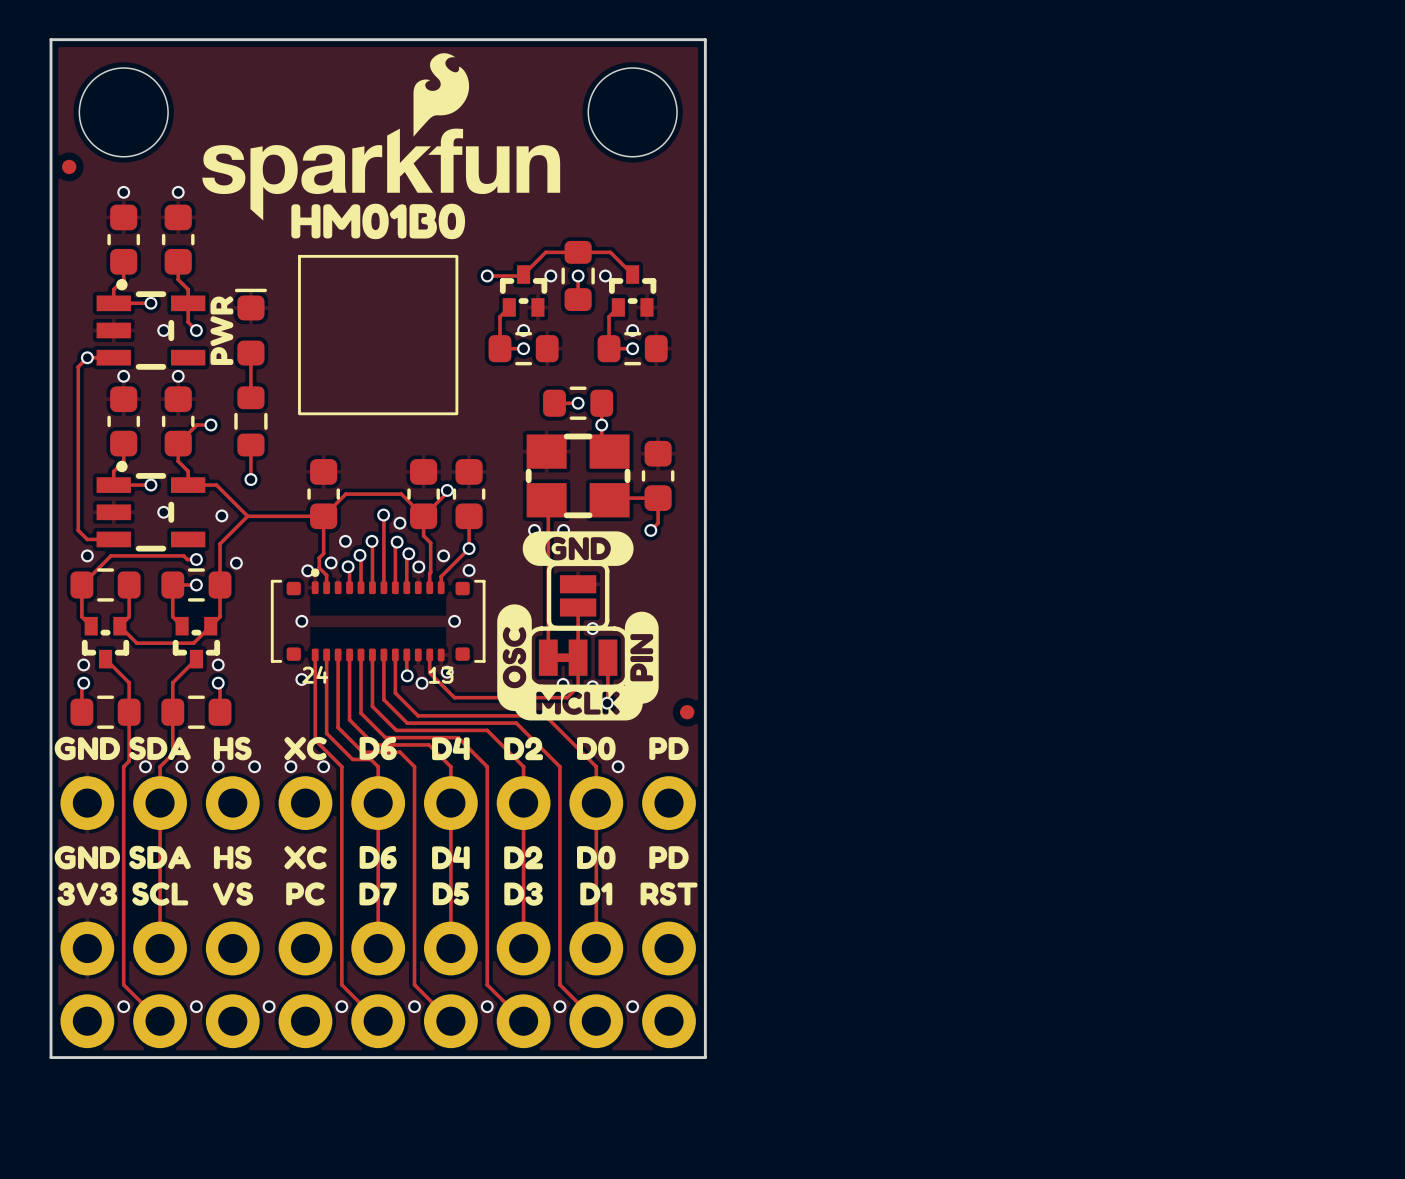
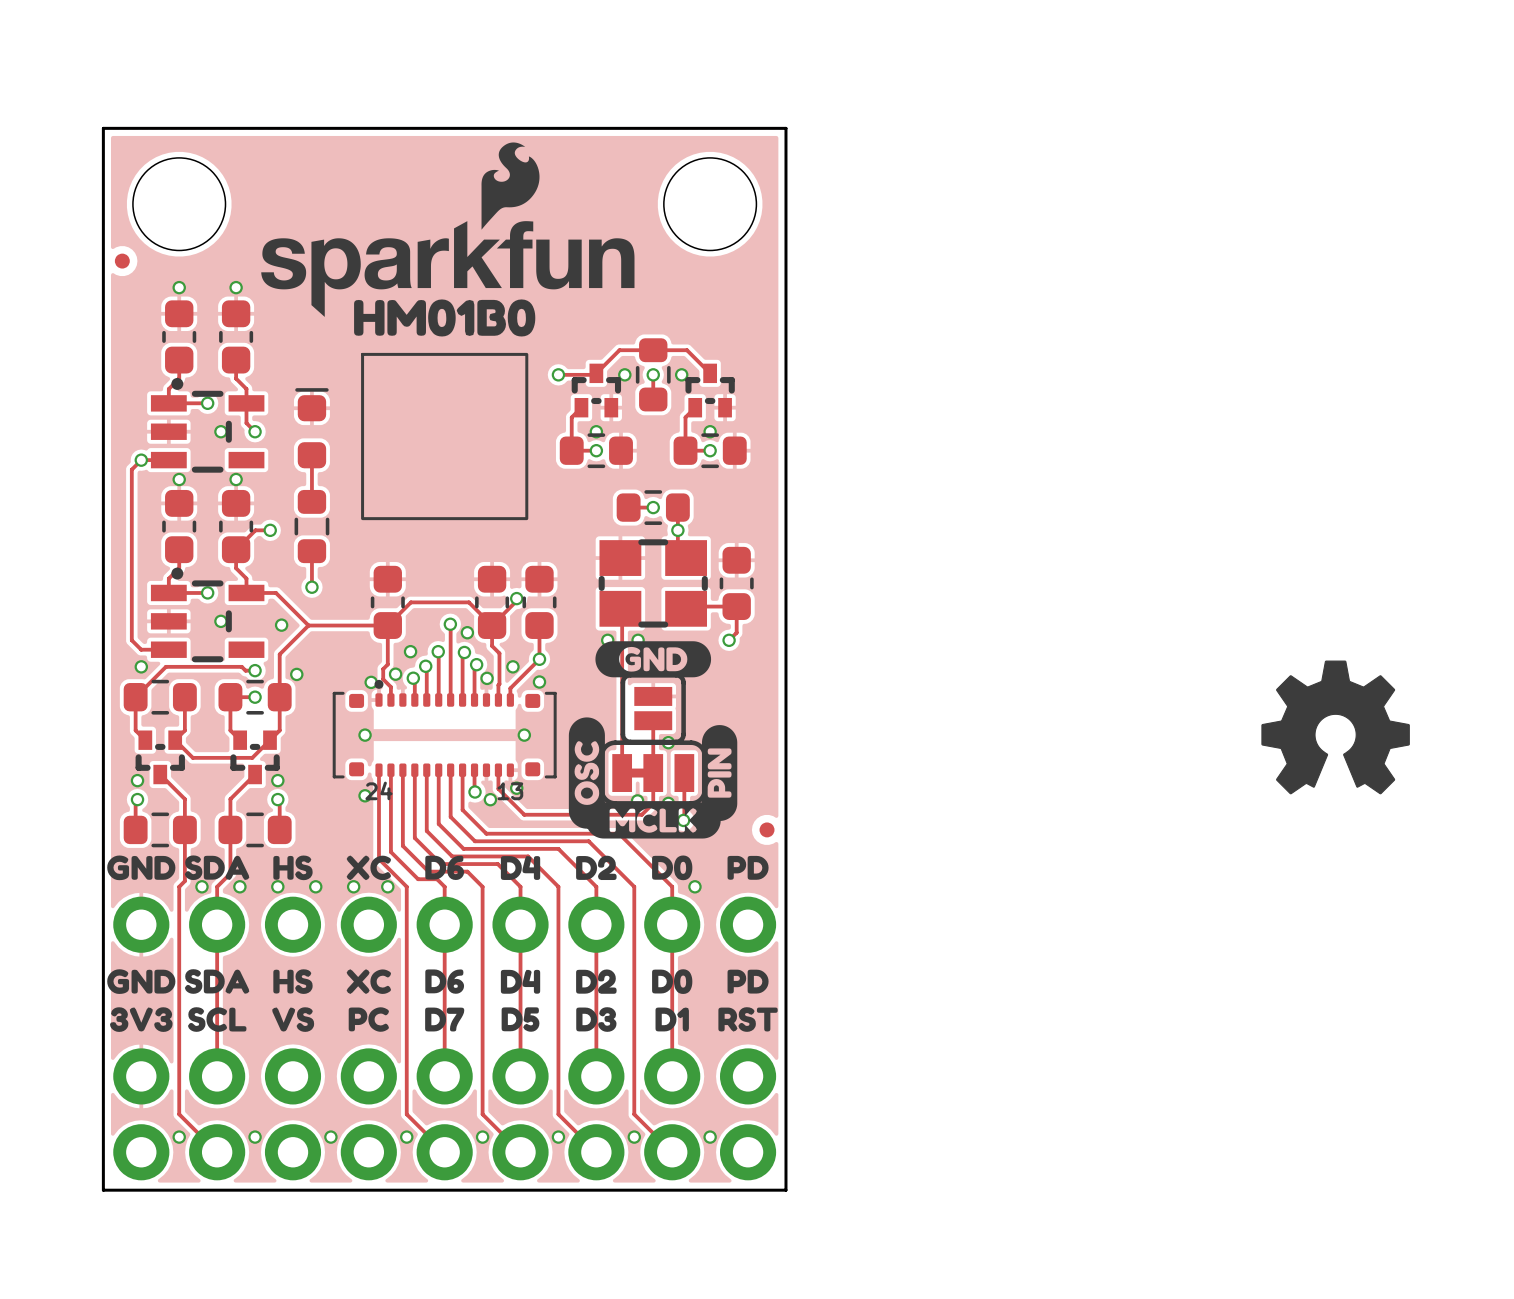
drawing: [210, 296, 234, 365] -> none
drawing: none -> [1261, 660, 1410, 795]

